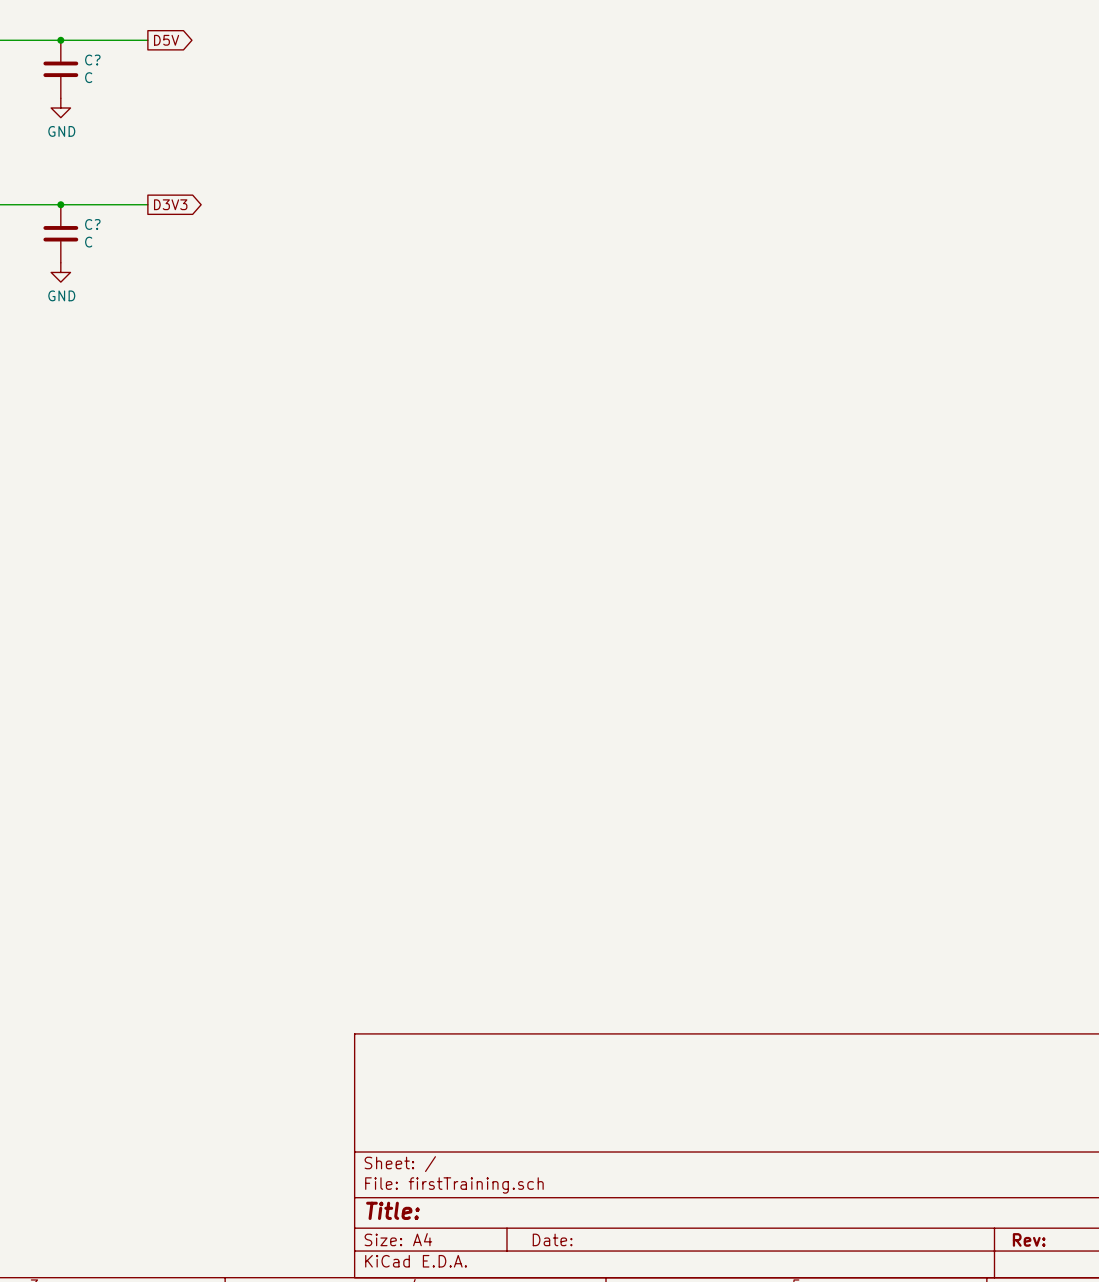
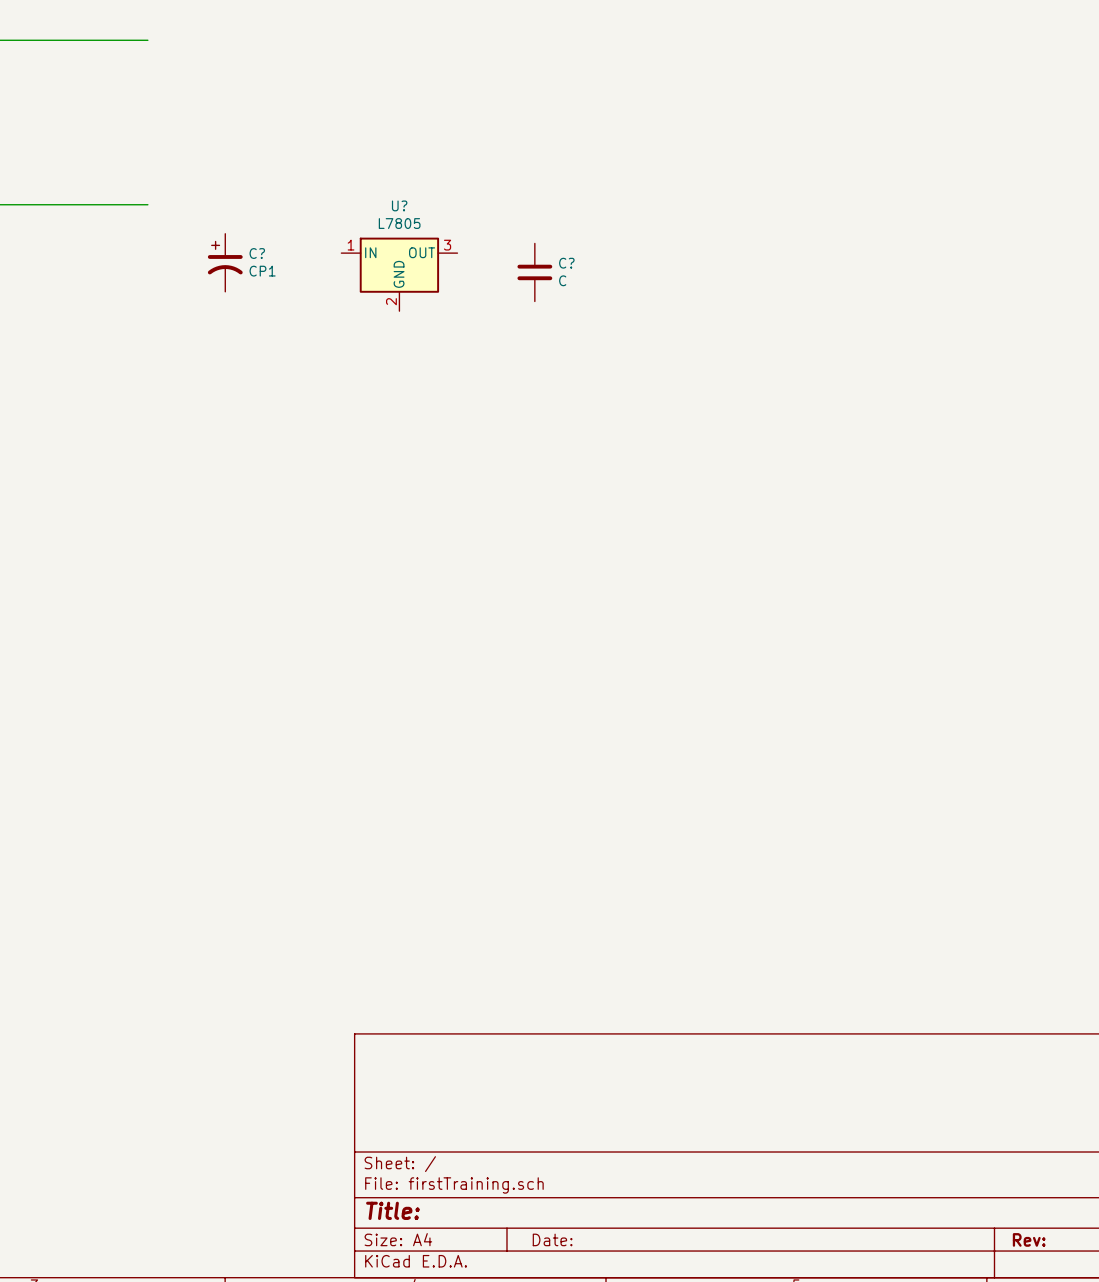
junction: (60, 40) -> none
global label: D5V (166, 40) -> none
C?: C (60, 69) -> none
power symbol: GND (60, 108) -> none
junction: (60, 204) -> none
global label: D3V3 (170, 204) -> none
C?: C (60, 233) -> none
C?: none -> CP1 (225, 262)
power symbol: GND (60, 272) -> none
C?: none -> C (534, 272)
U?: none -> L7805 (399, 274)

